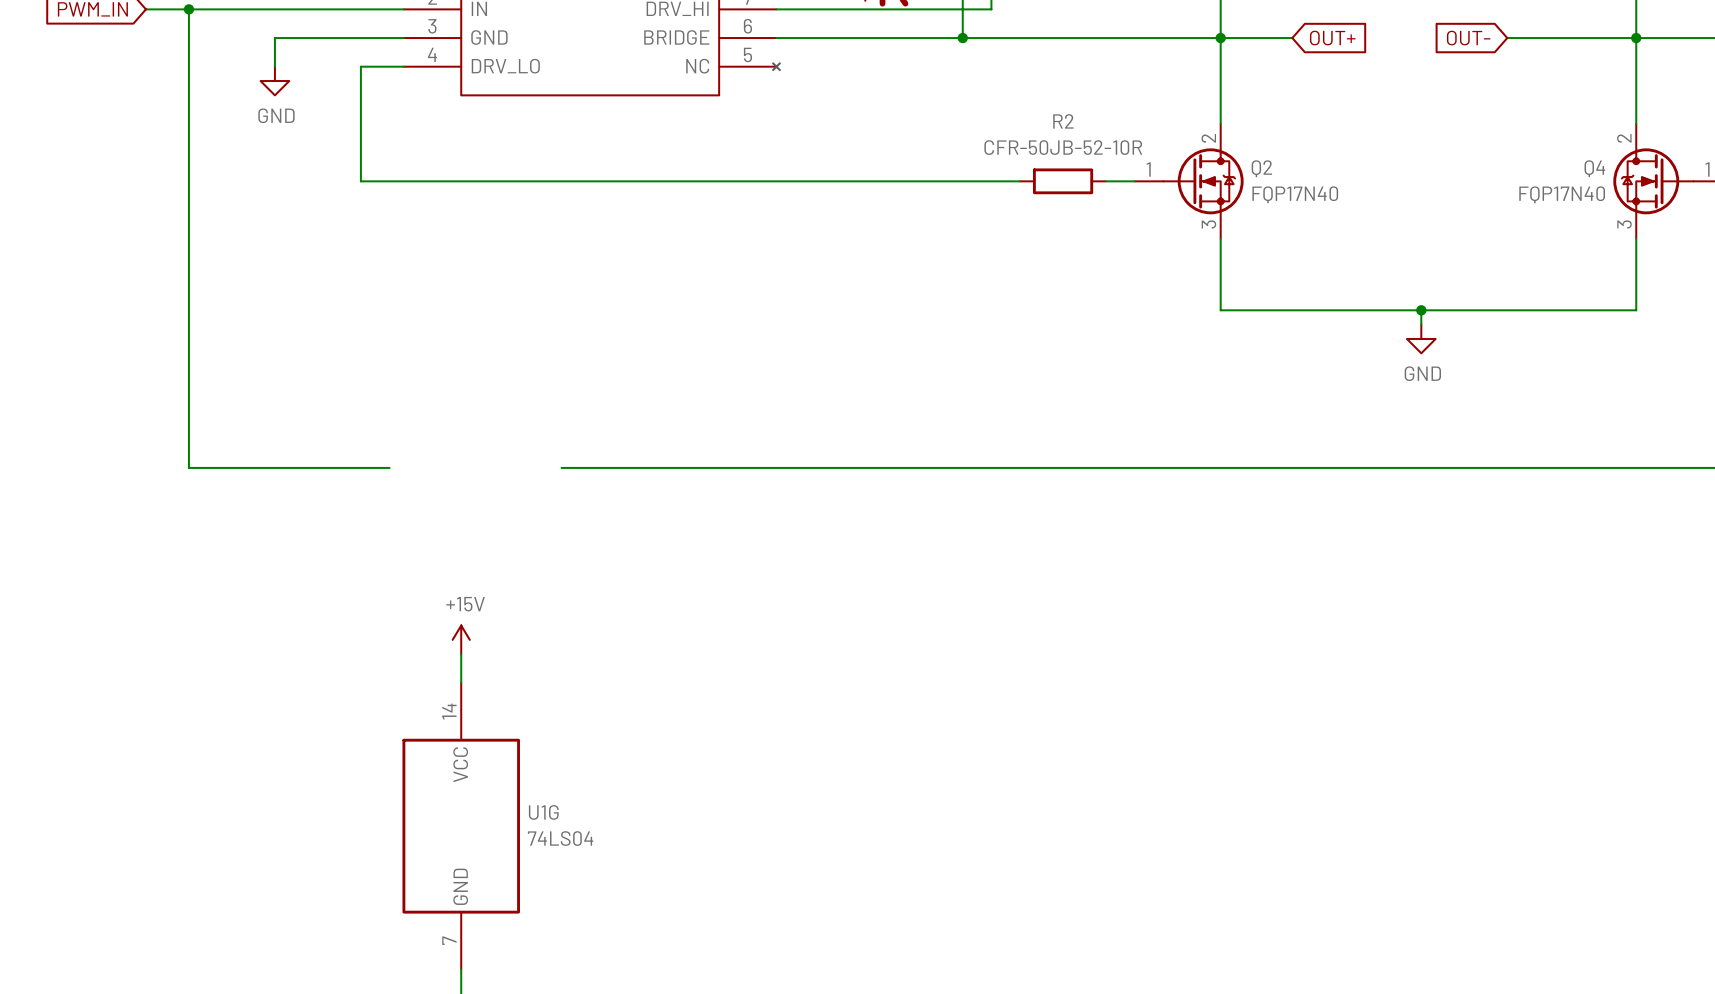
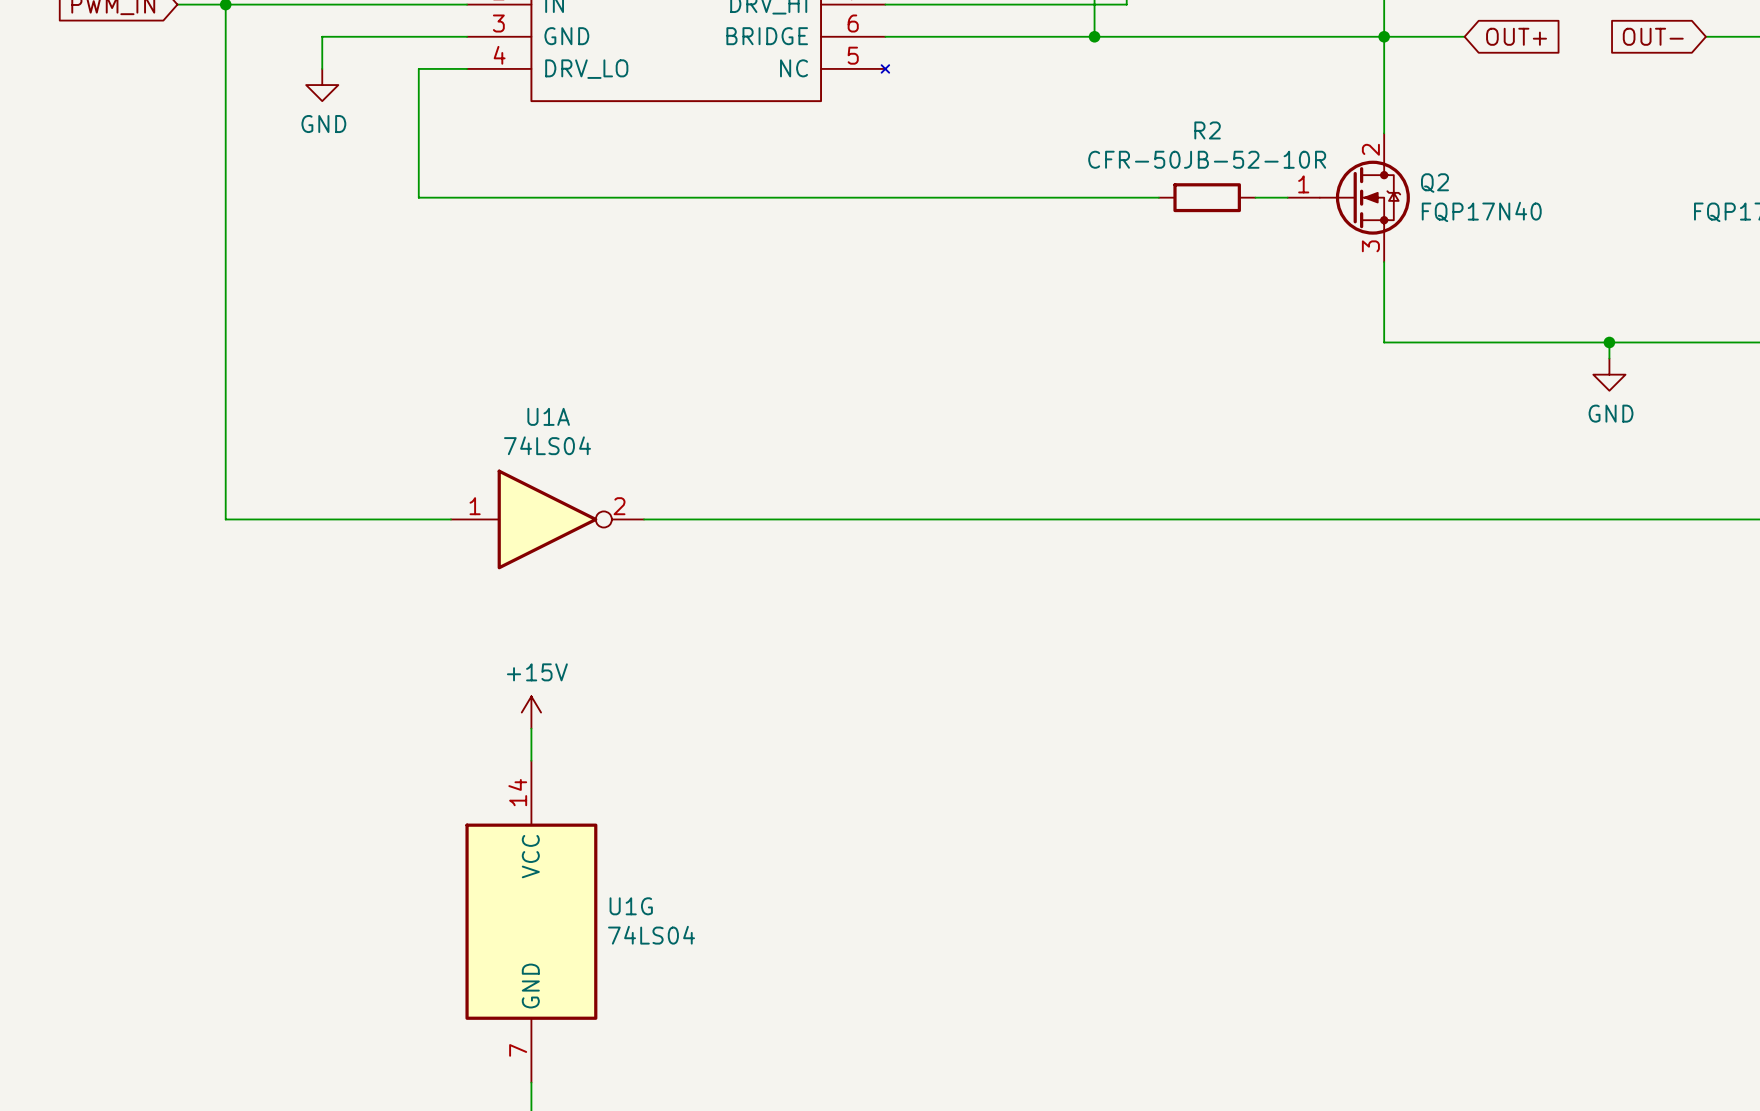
U1A: none -> 74LS04 (547, 519)

